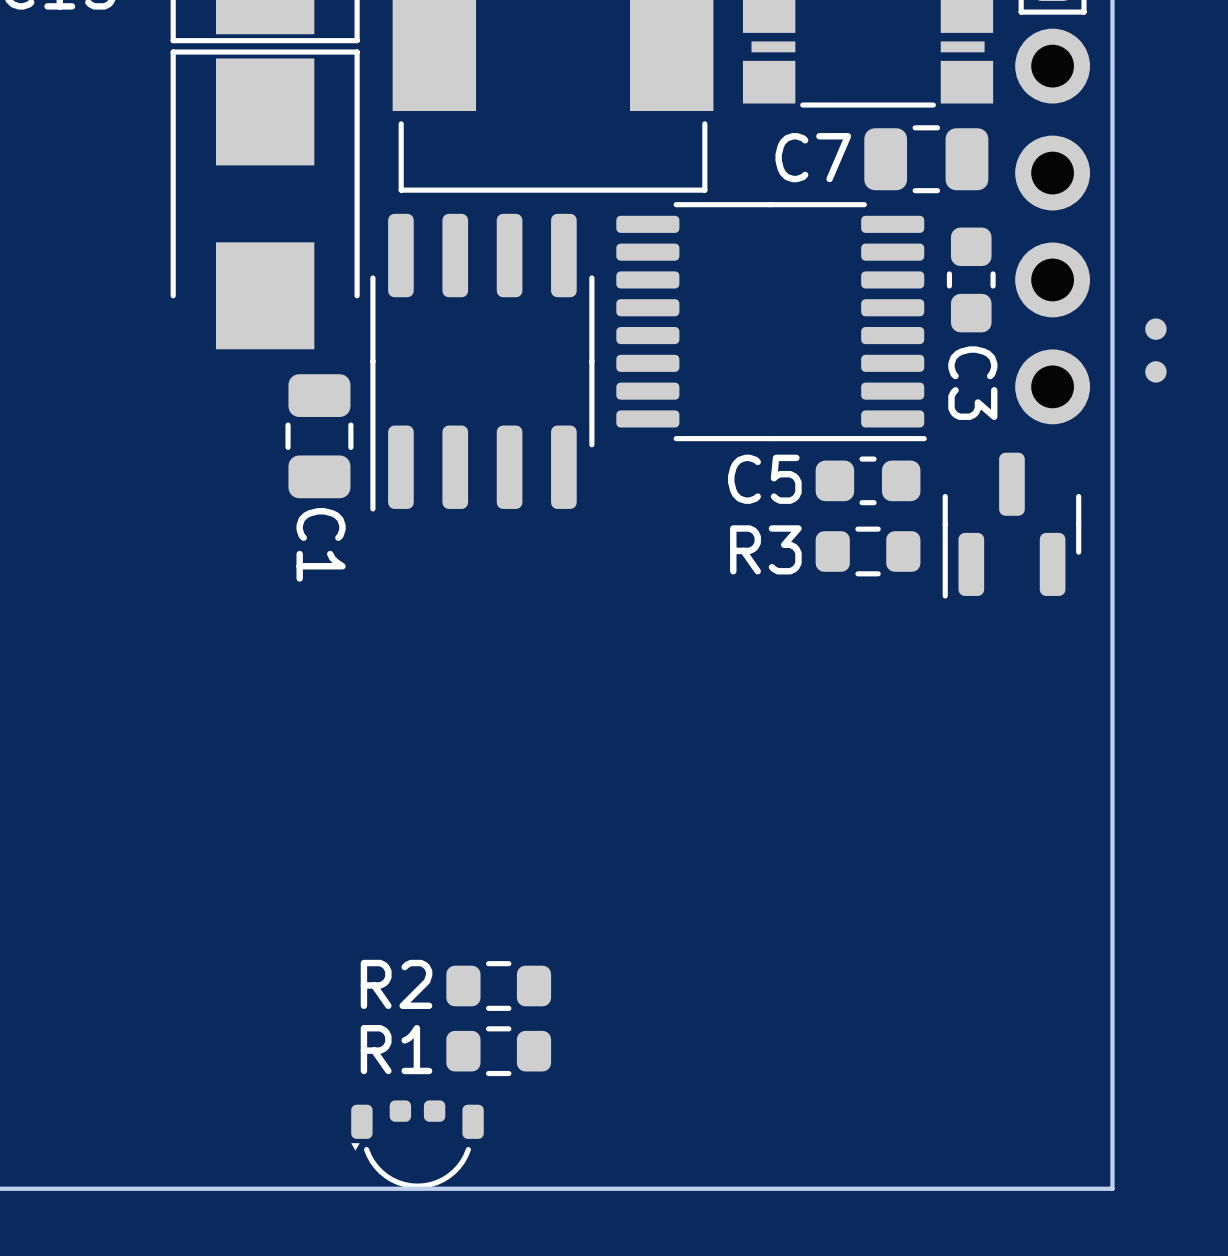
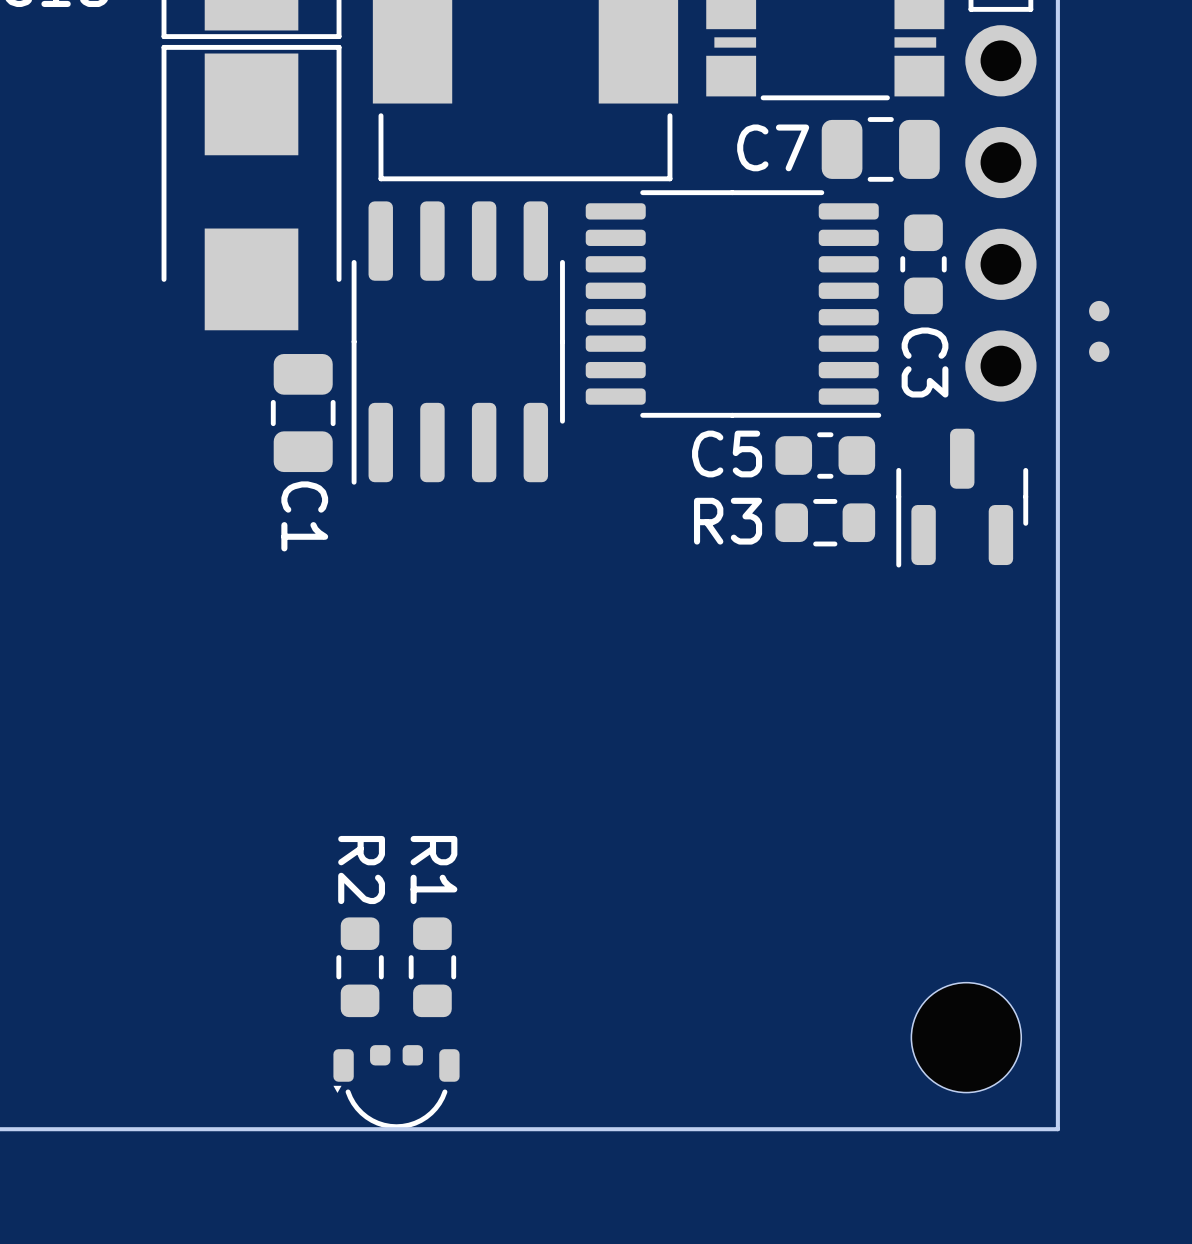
R2 rotation: 0° (498, 986) -> 90° clockwise (360, 967)
R2 position: (498, 986) -> (360, 967)
R1 rotation: 0° (498, 1051) -> 90° clockwise (432, 967)
part: none -> (966, 1037)

